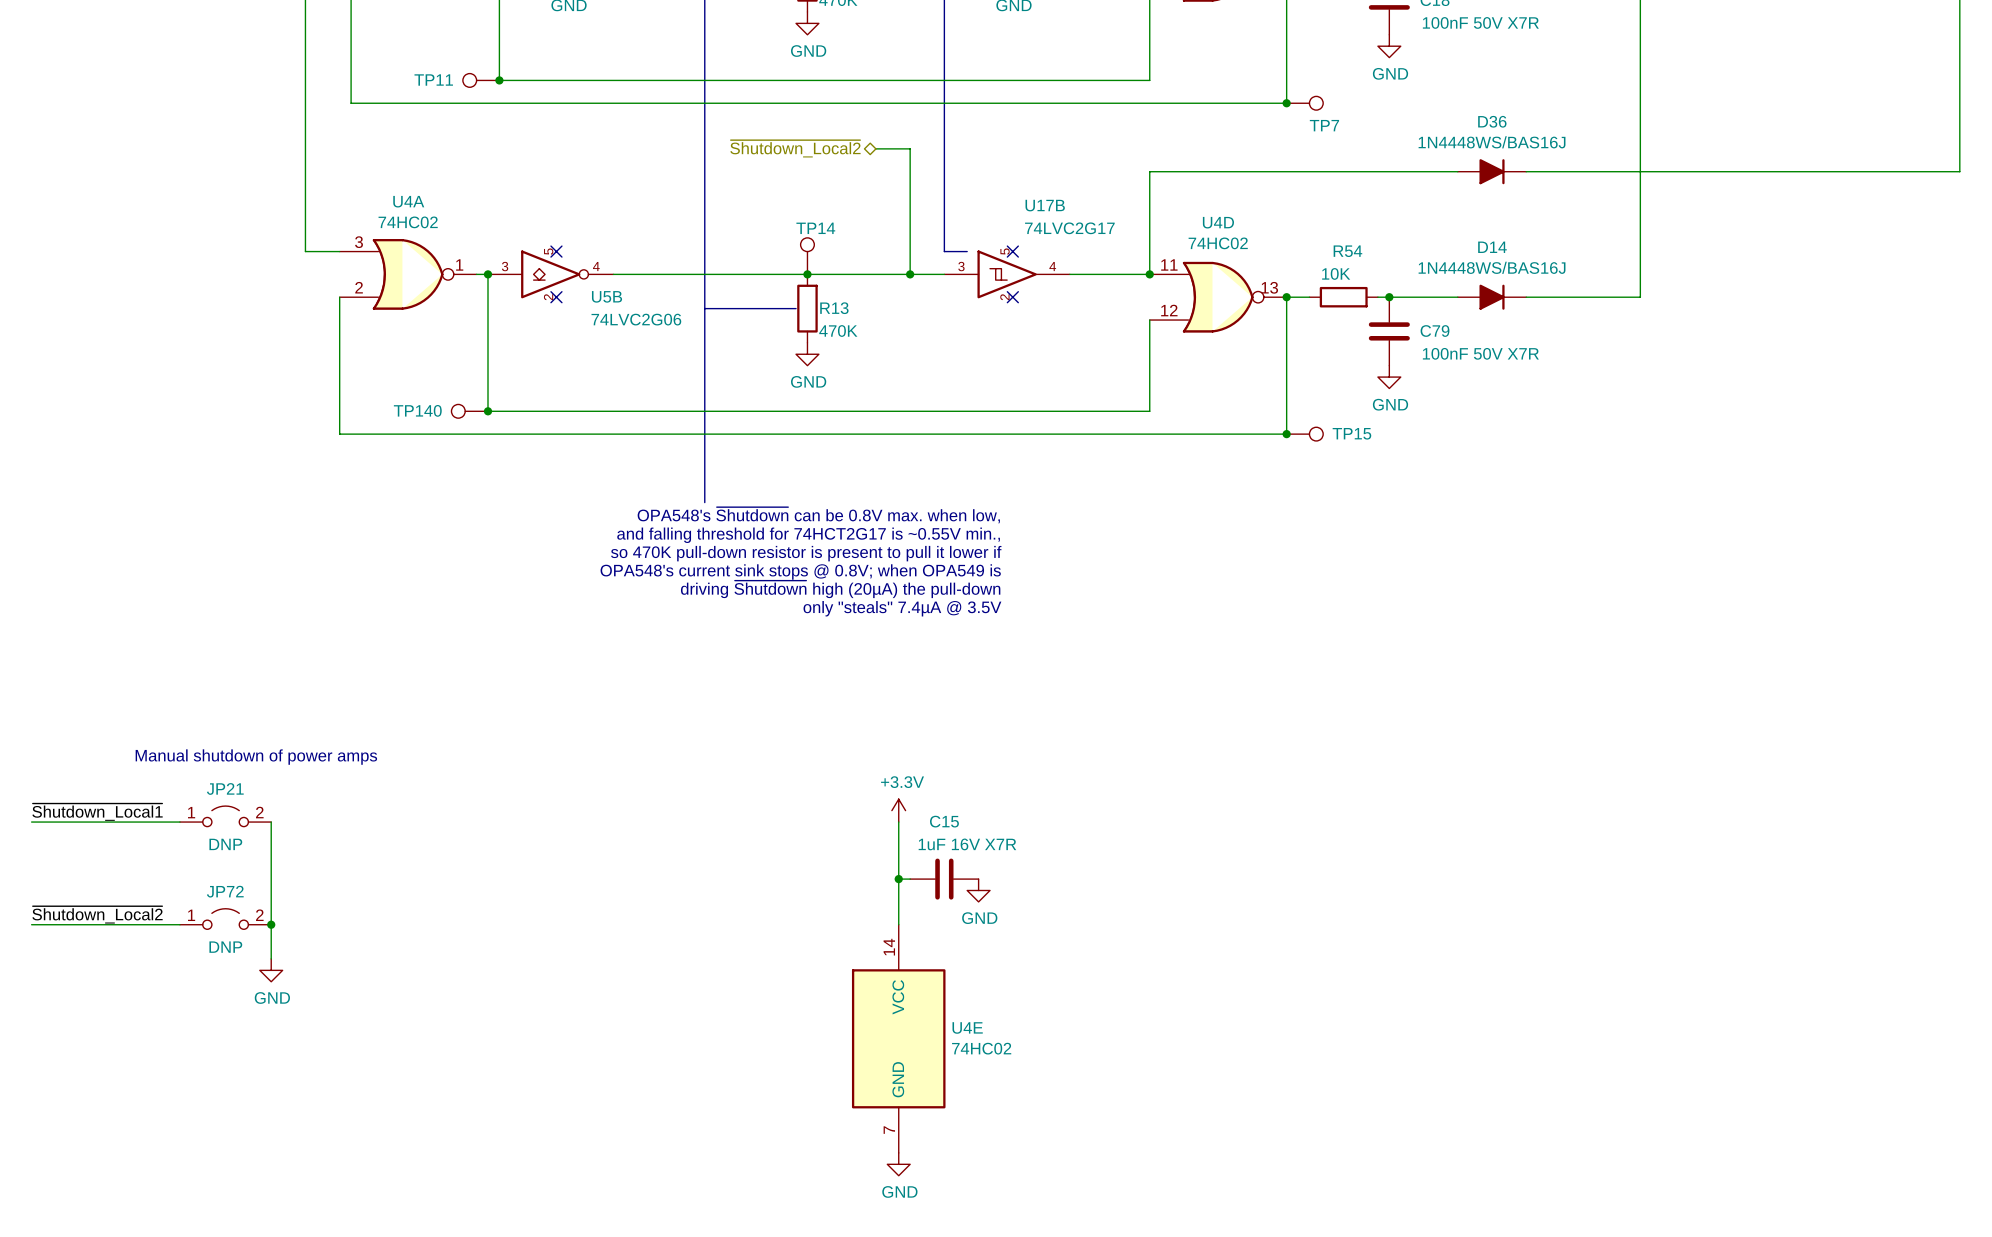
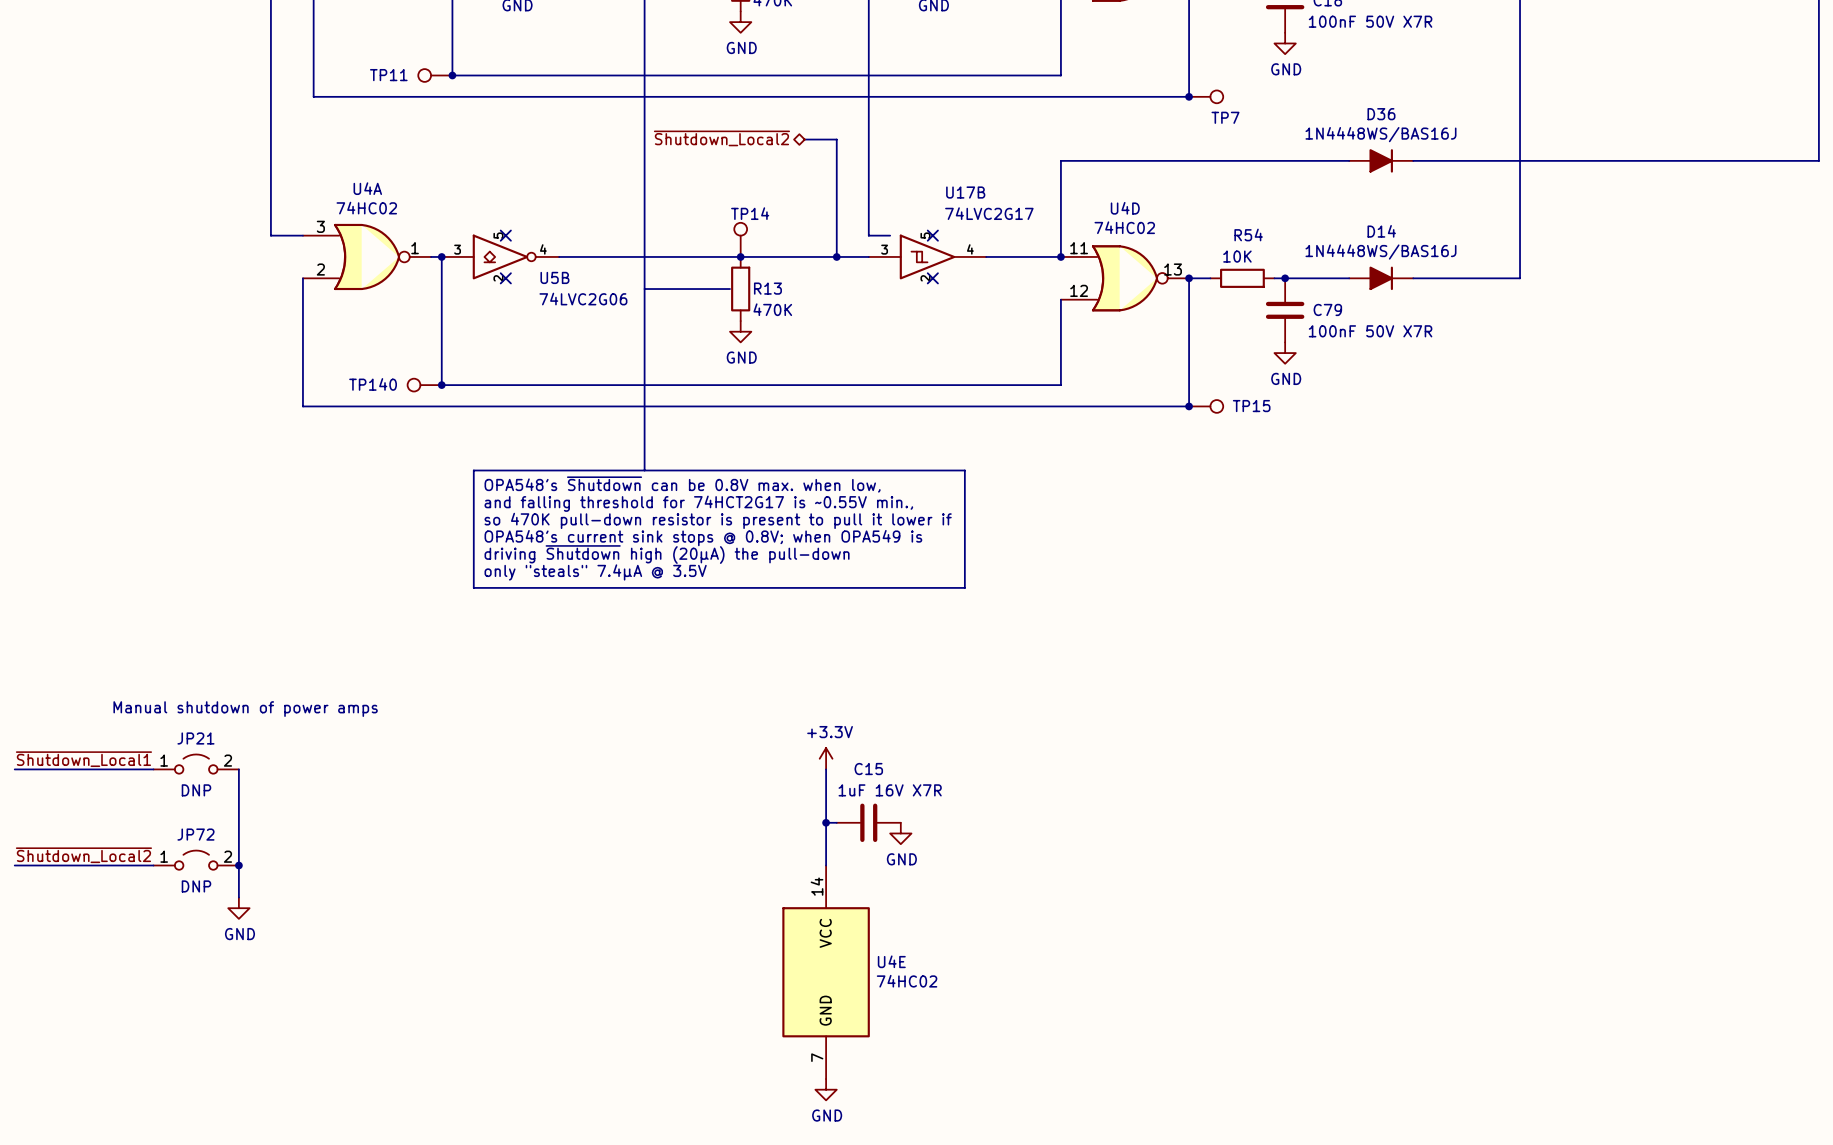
line: none -> (473, 470) (964, 470) (964, 587) (473, 587) (473, 470)
text: OPA548's ~{Shutdown} can be 0.8V max. when low, (818, 515) -> none
text: none -> OPA548's ~{Shutdown} can be 0.8V max. when low, (682, 484)
text: and falling threshold for 74HCT2G17 is ~0.55V min., (808, 535) -> none
text: none -> and falling threshold for 74HCT2G17 is ~0.55V min., (698, 503)
text: so 470K pull-down resistor is present to pull it lower if (806, 553) -> none
text: none -> so 470K pull-down resistor is present to pull it lower if (718, 520)
text: OPA548's current sink stops @ 0.8V; when OPA549 is (800, 572) -> none
text: none -> OPA548's current sink stops @ 0.8V; when OPA549 is (703, 538)
text: driving ~{Shutdown} high (20µA) the pull-down (840, 589) -> none
text: none -> driving ~{Shutdown} high (20µA) the pull-down (667, 554)
text: only "steals" 7.4µA @ 3.5V (902, 608) -> none
text: none -> only "steals" 7.4µA @ 3.5V (595, 572)

